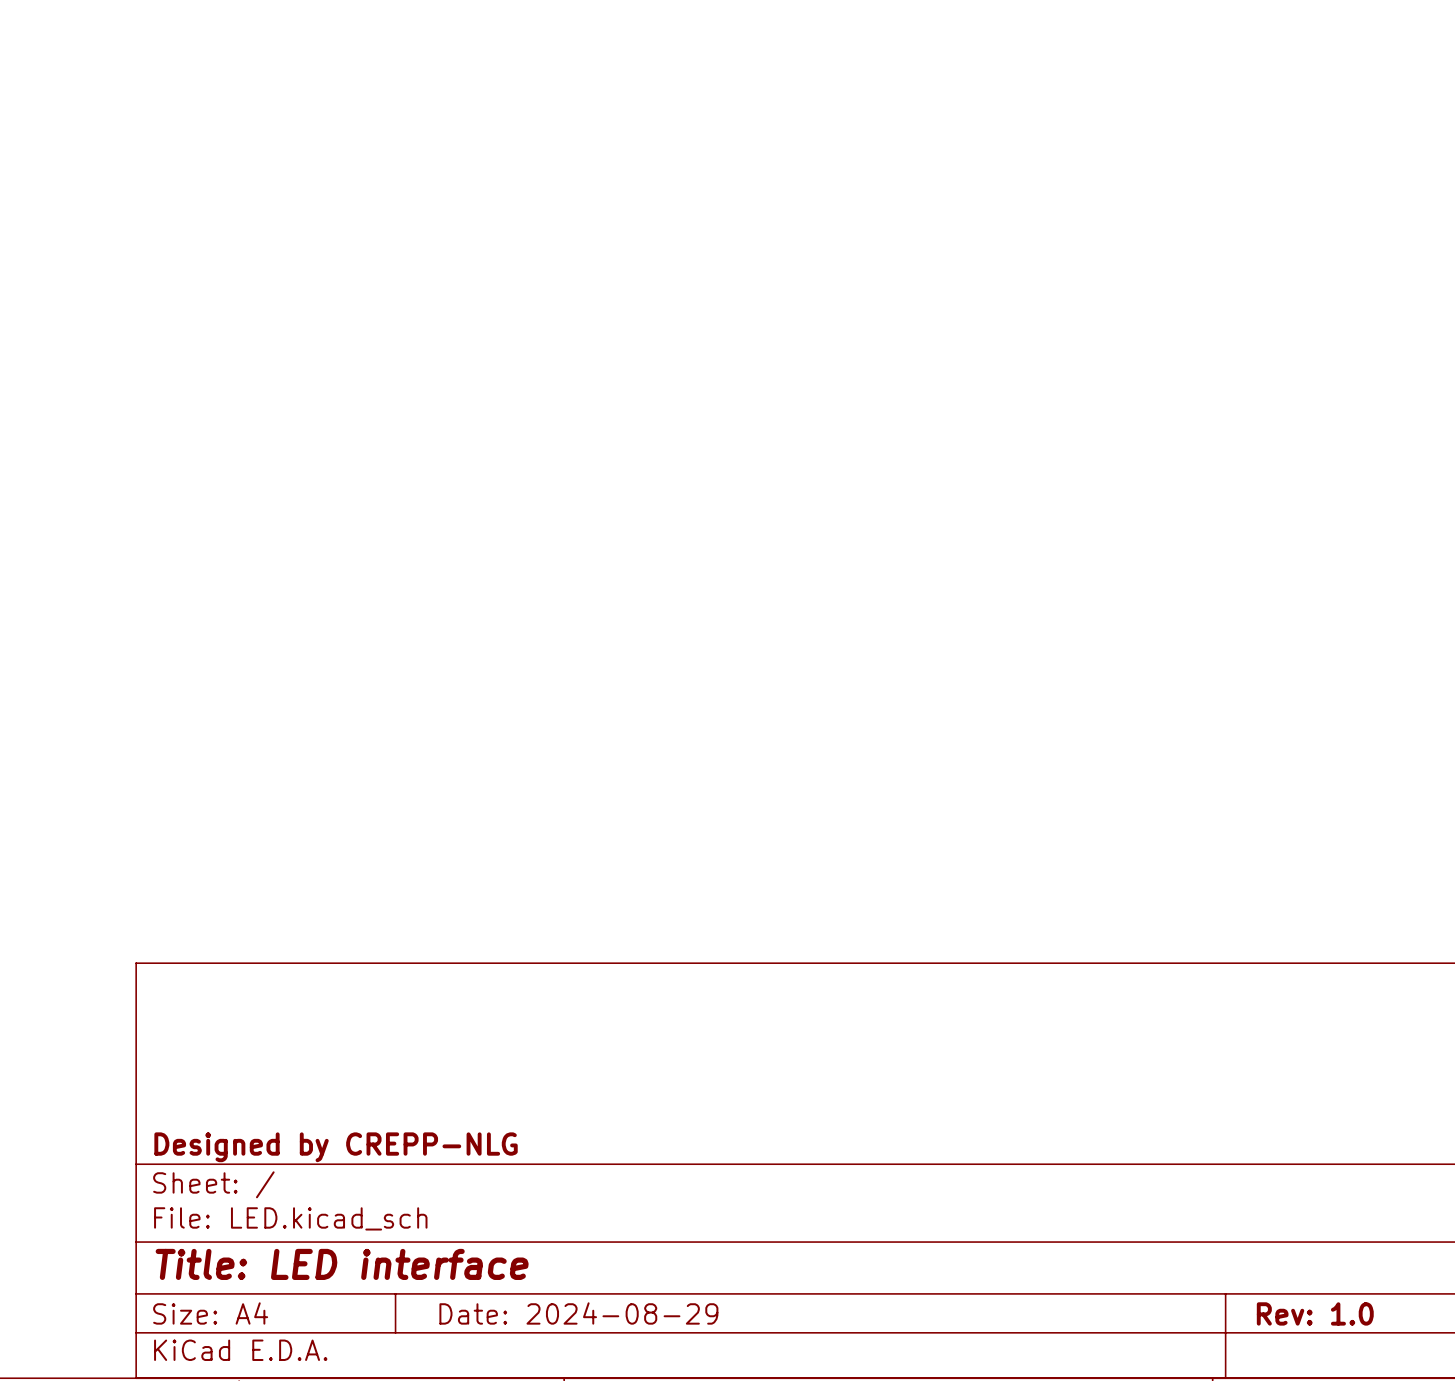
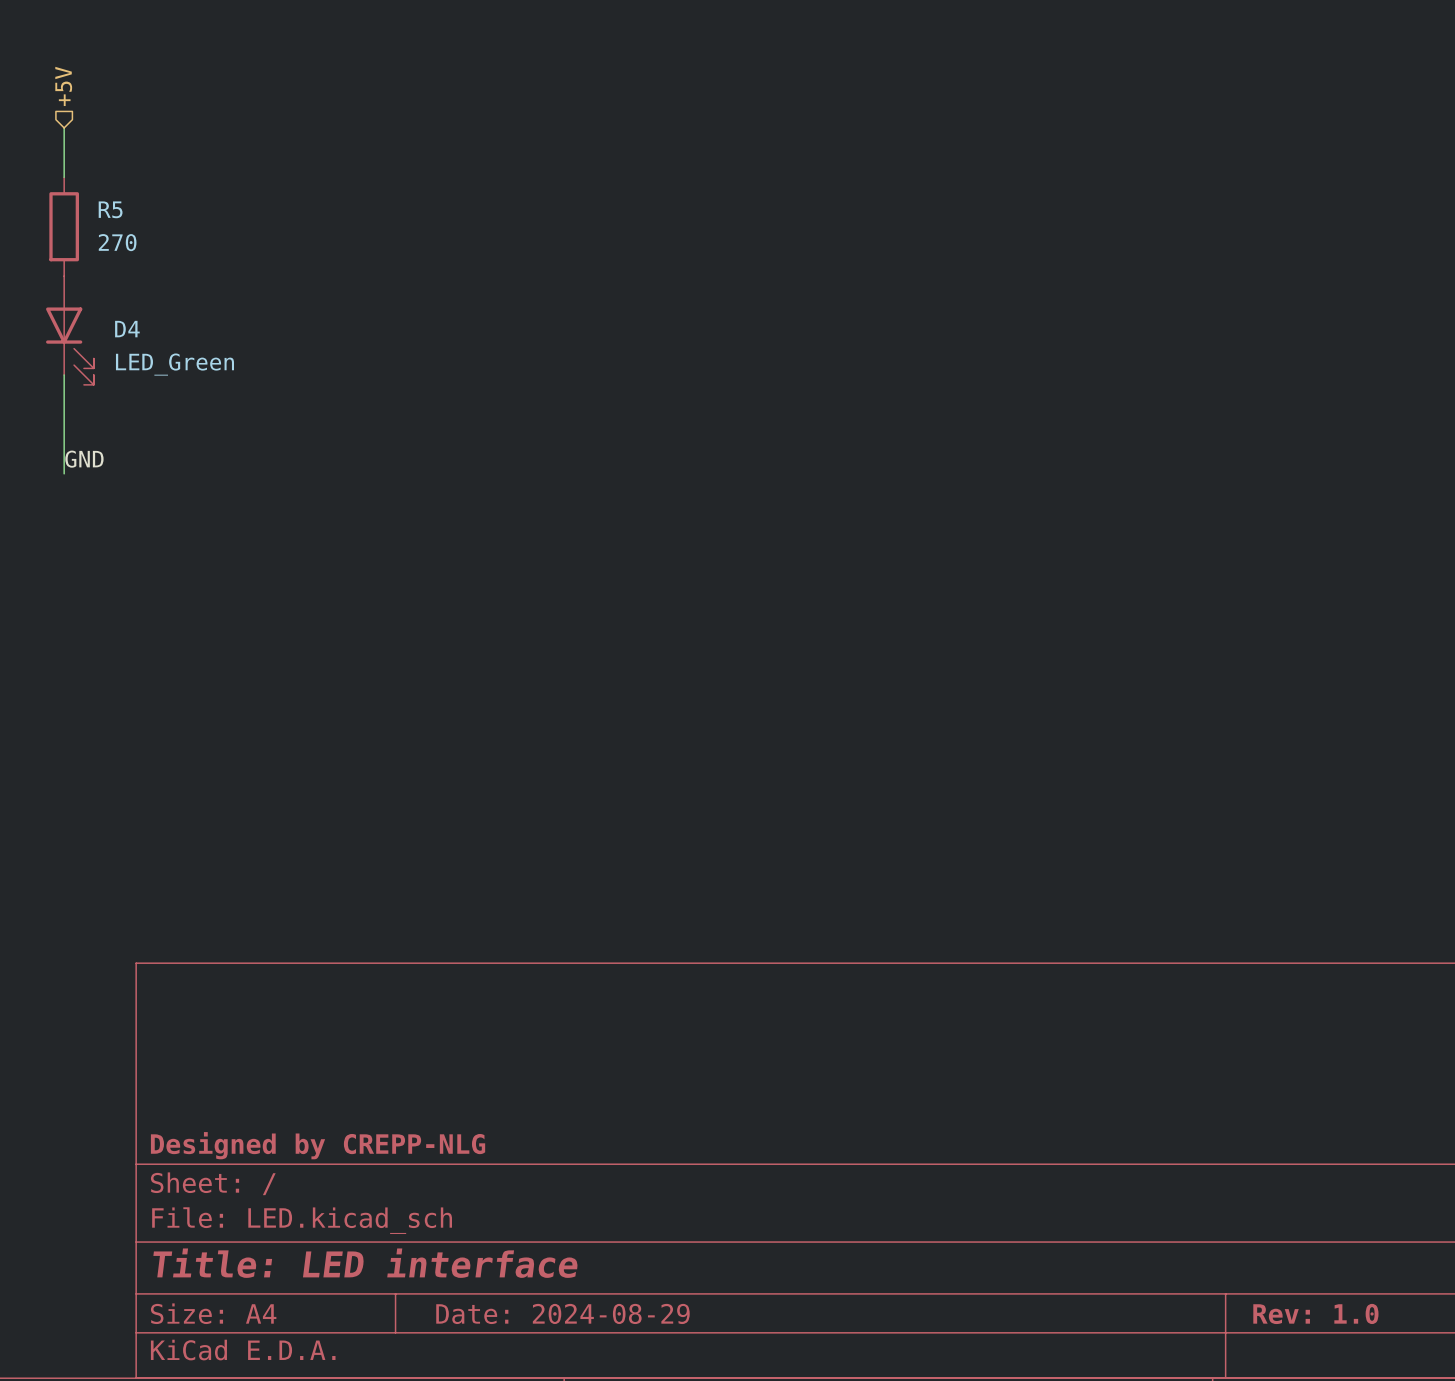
hierarchical label: none -> +5V (63, 86)
wire: none -> (64, 127) (64, 177)
R5: none -> 270 (64, 226)
D4: none -> LED_Green (69, 330)
wire: none -> (64, 374) (64, 473)
label: none -> GND (84, 459)

